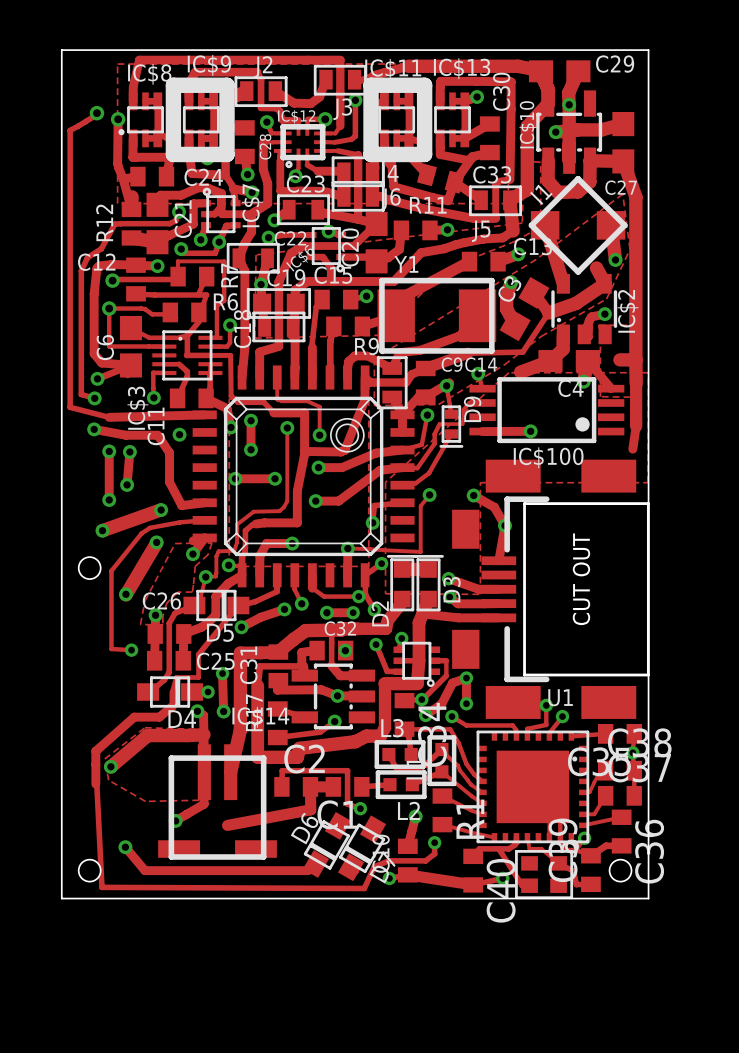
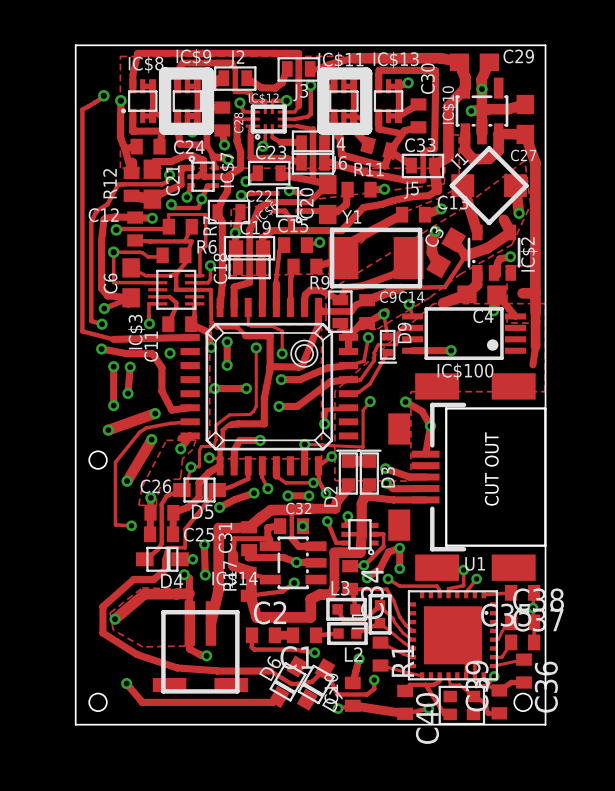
track: (259, 666) (257, 685) (257, 757) (297, 757) (299, 748) (355, 741) -> (234, 538) (233, 565) (251, 571) (251, 598) (256, 617) (310, 617) (310, 599)
track: (95, 764) (101, 887) (364, 888) (374, 866) (388, 860) -> (102, 633) (136, 654) (177, 667) (217, 671) (270, 671) (291, 684) (312, 681) (324, 669) (337, 694)
track: (281, 786) (282, 770) (347, 770) (347, 804) (360, 808) -> (251, 635) (251, 647) (254, 649) (294, 649) (314, 652)
track: (310, 786) (310, 809) (227, 825) -> none
track: (204, 804) (175, 820) -> (189, 649) (206, 655)
via position: (175, 820) -> (206, 655)

